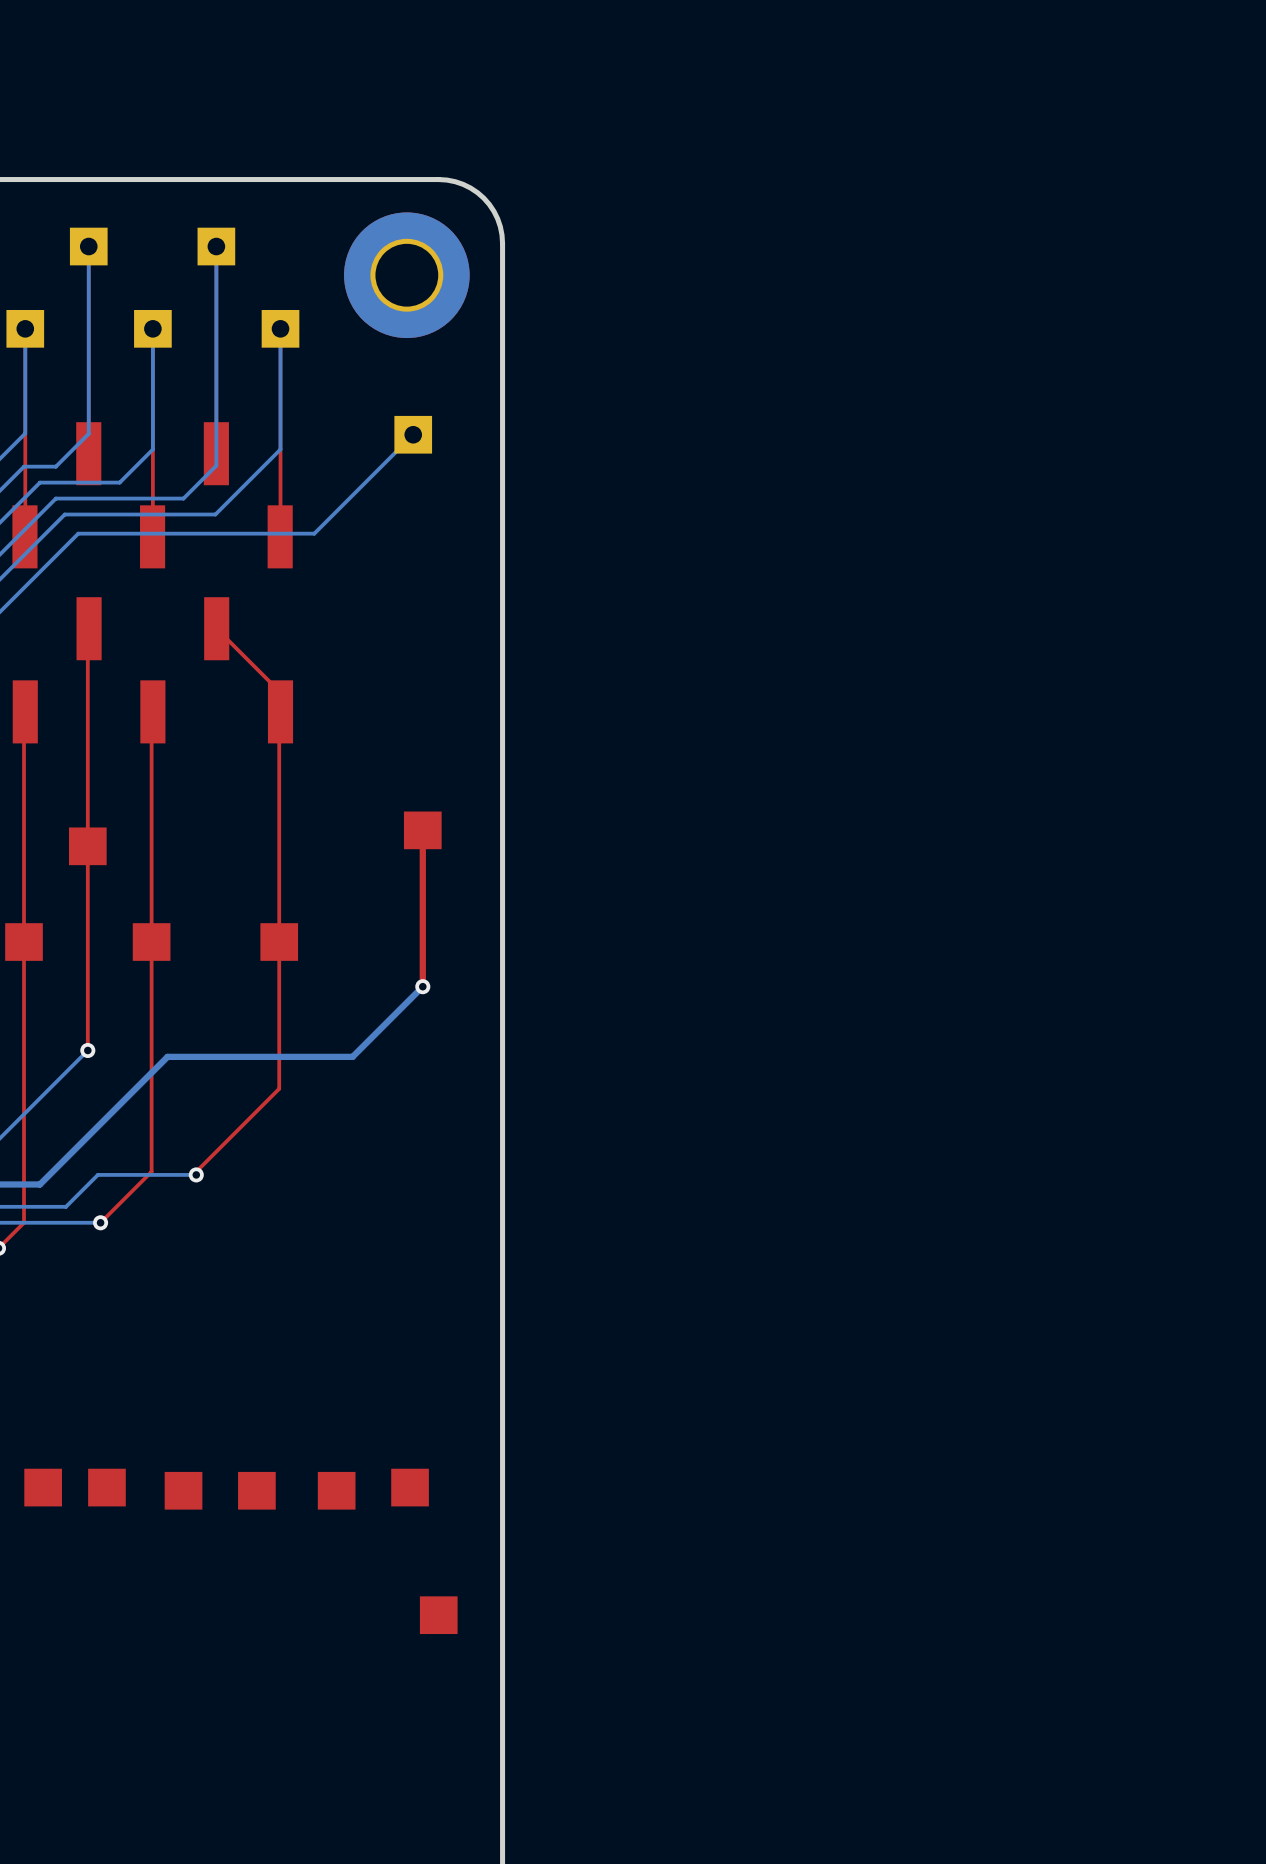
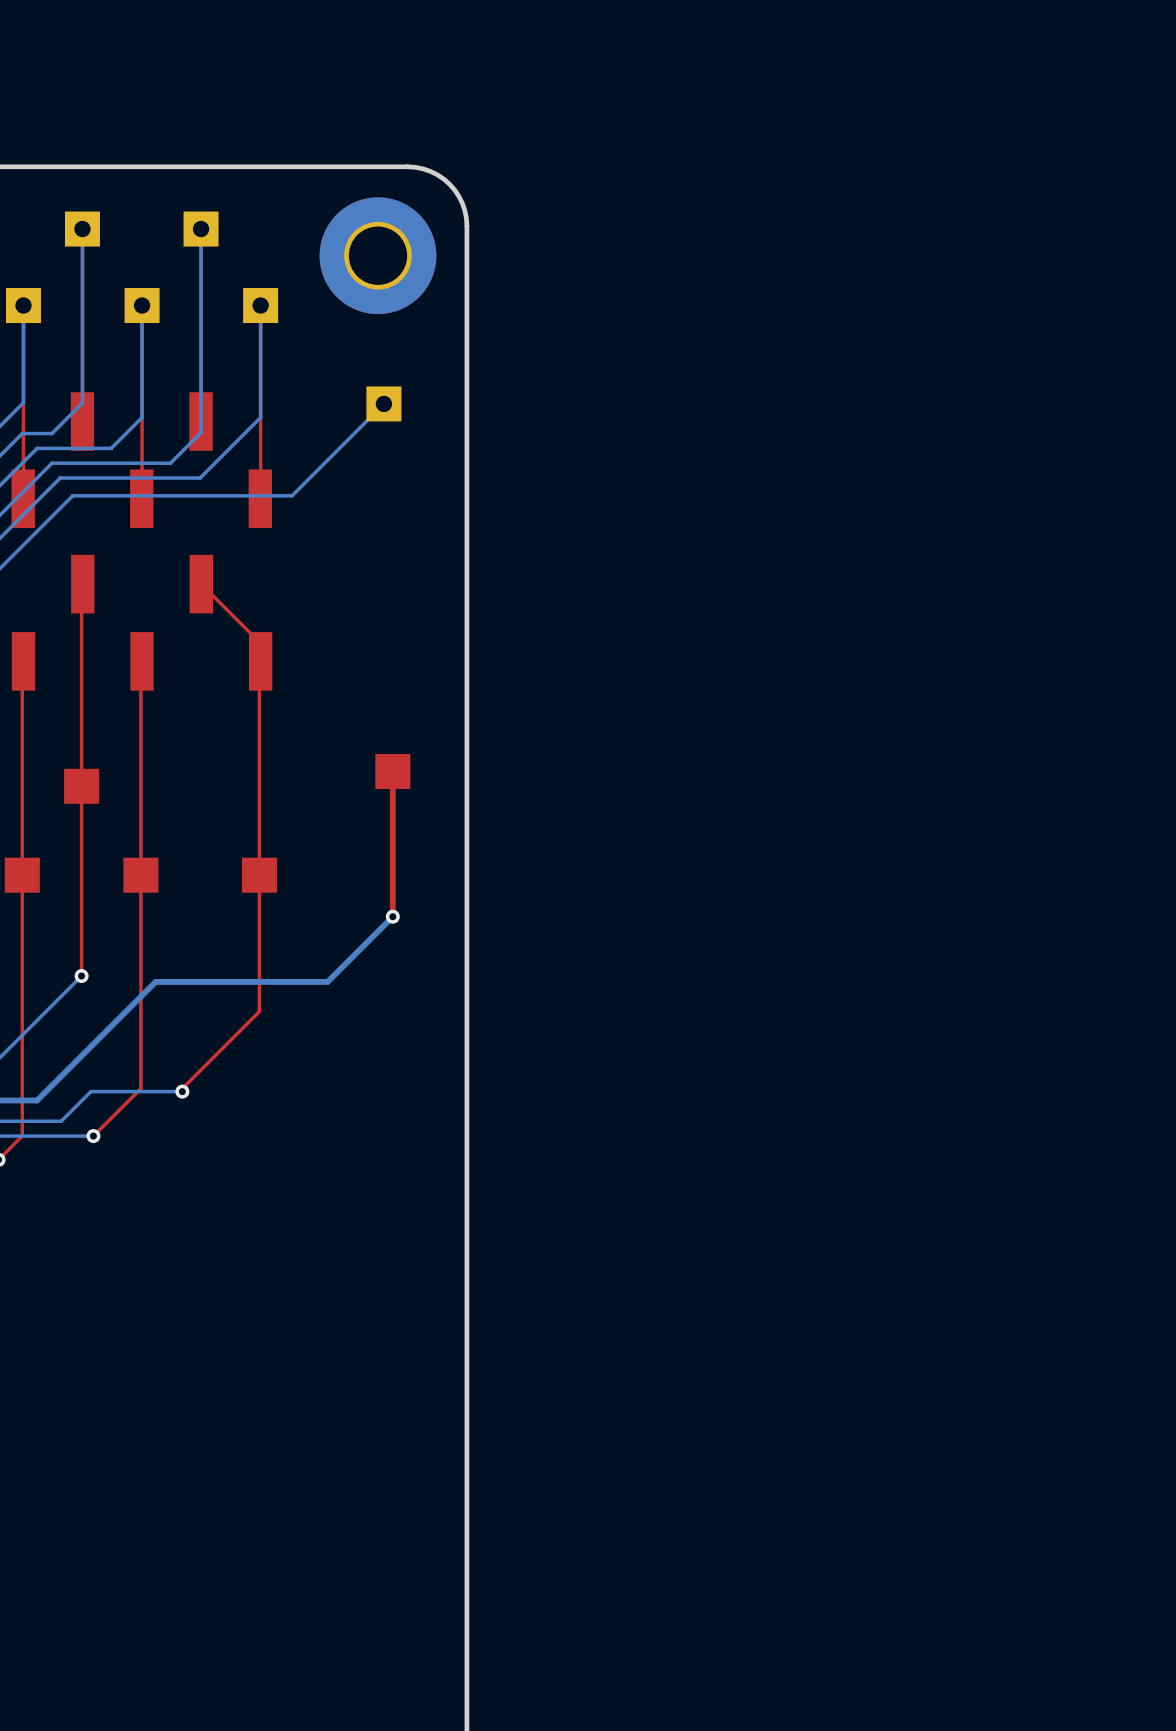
part: (43, 1487) -> none
part: (106, 1487) -> none
part: (410, 1487) -> none
part: (183, 1490) -> none
part: (256, 1490) -> none
part: (336, 1490) -> none
part: (438, 1615) -> none

